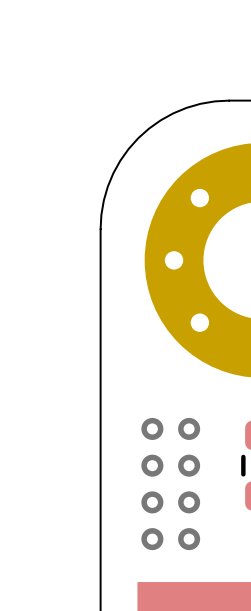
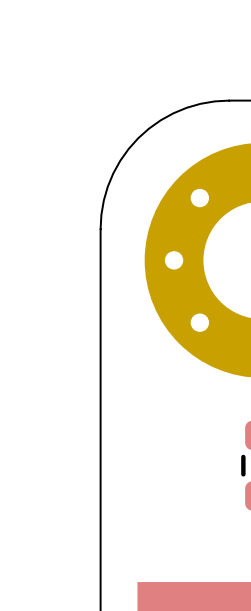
via: (152, 428) -> none
via: (189, 428) -> none
via: (152, 465) -> none
via: (189, 465) -> none
via: (152, 502) -> none
via: (189, 502) -> none
via: (152, 539) -> none
via: (189, 539) -> none

